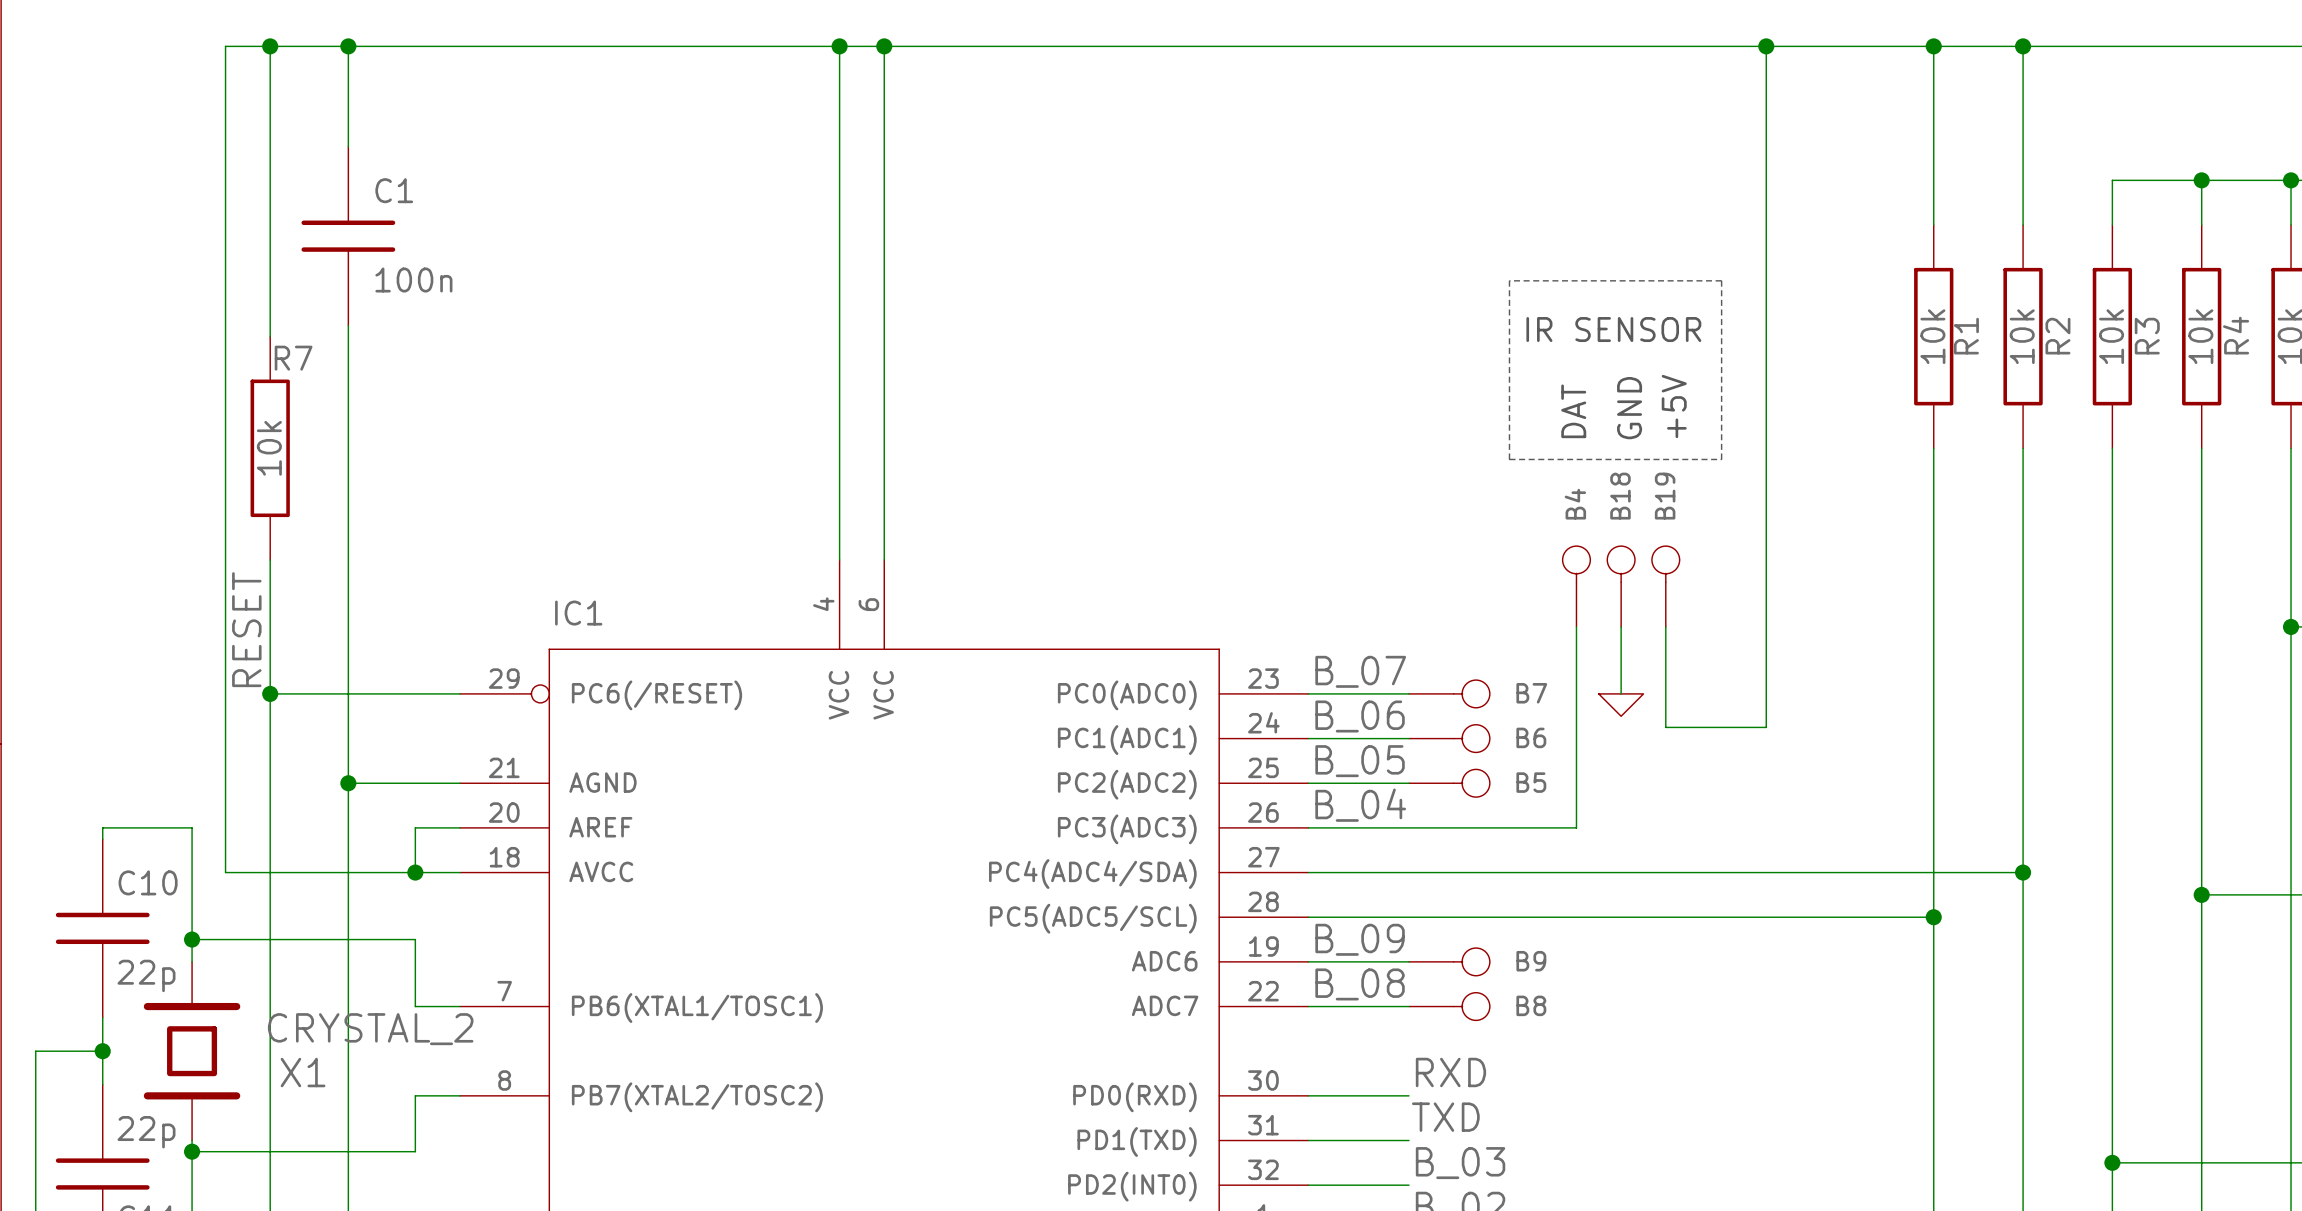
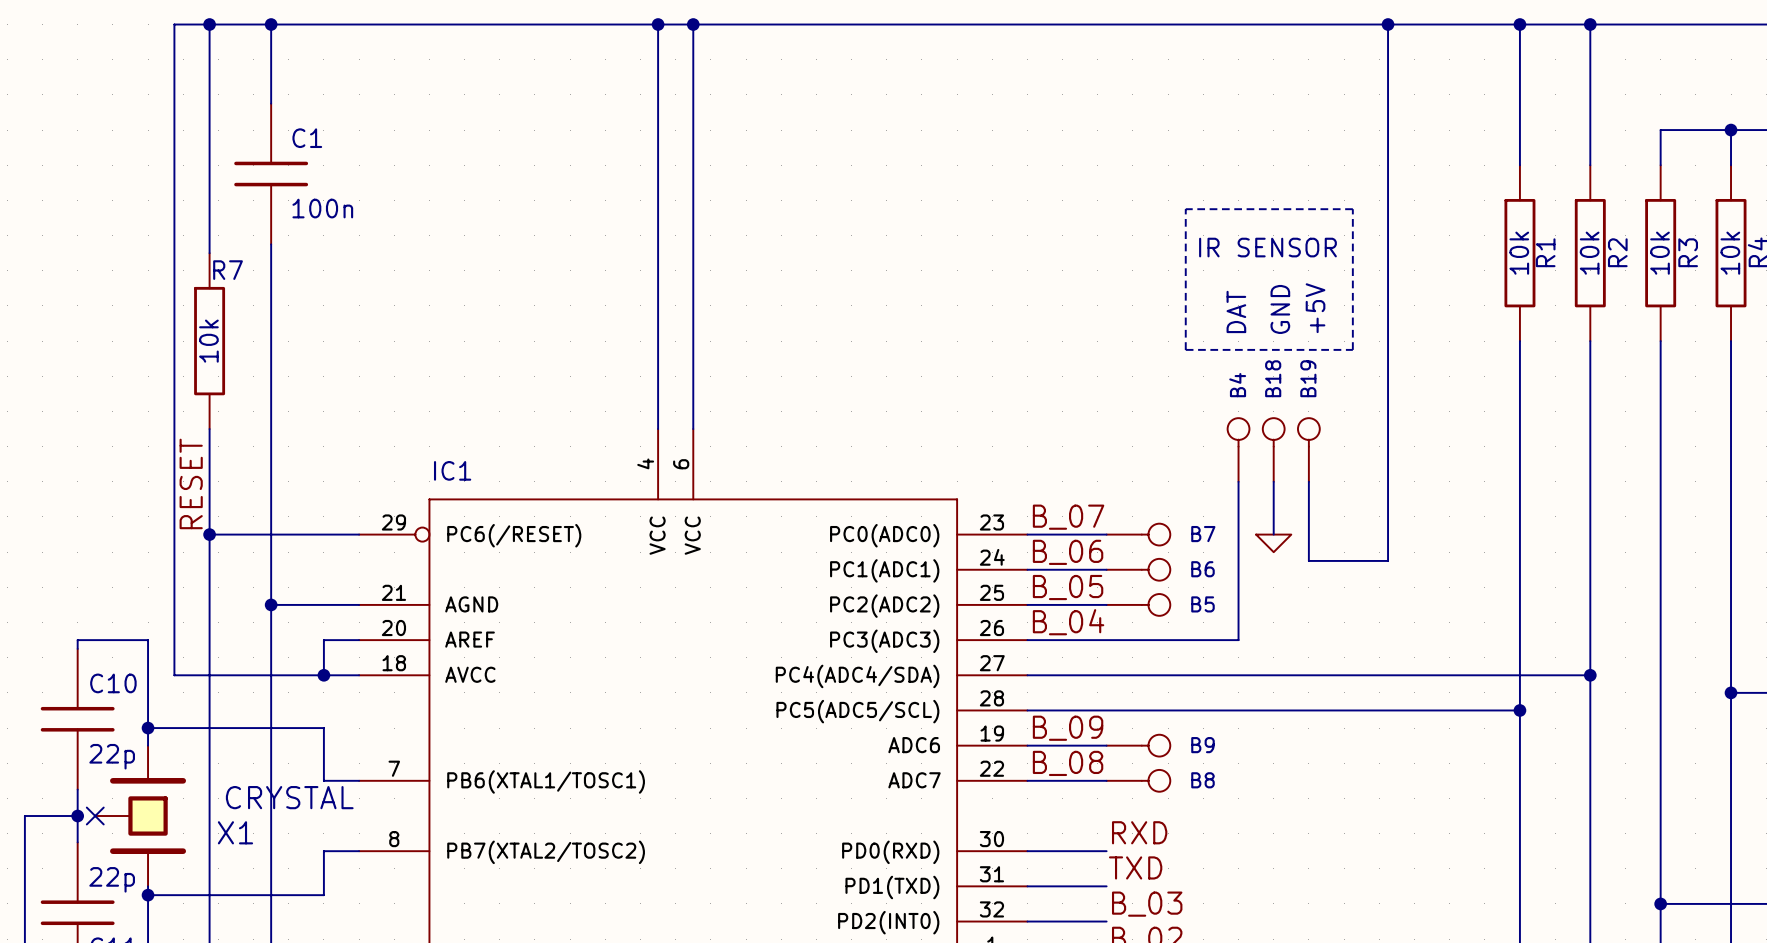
X1 symbol: [143, 961, 241, 1141] -> [95, 745, 187, 887]
X1 value: CRYSTAL_2 (370, 1029) -> CRYSTAL (289, 797)
no-connect mark: none -> (95, 816)

